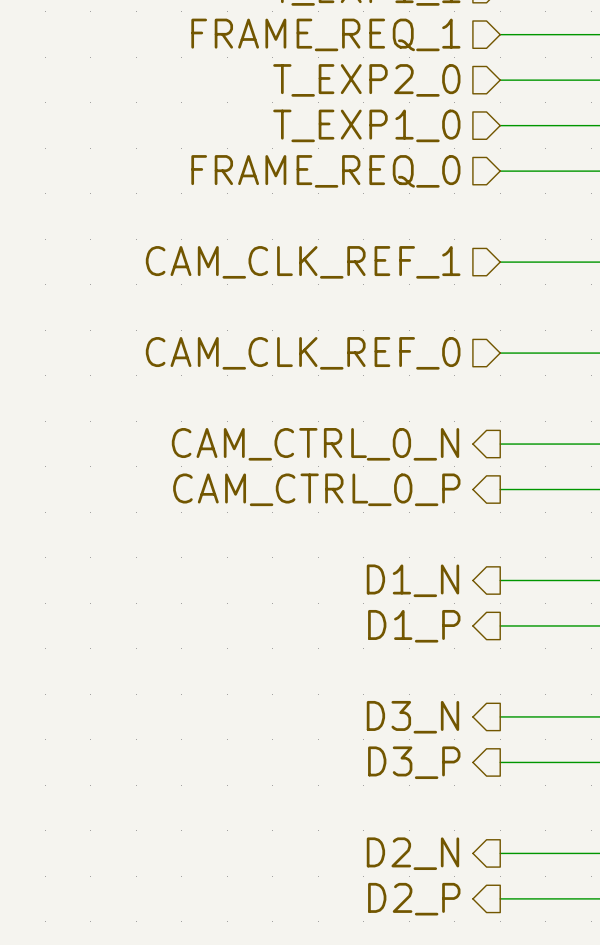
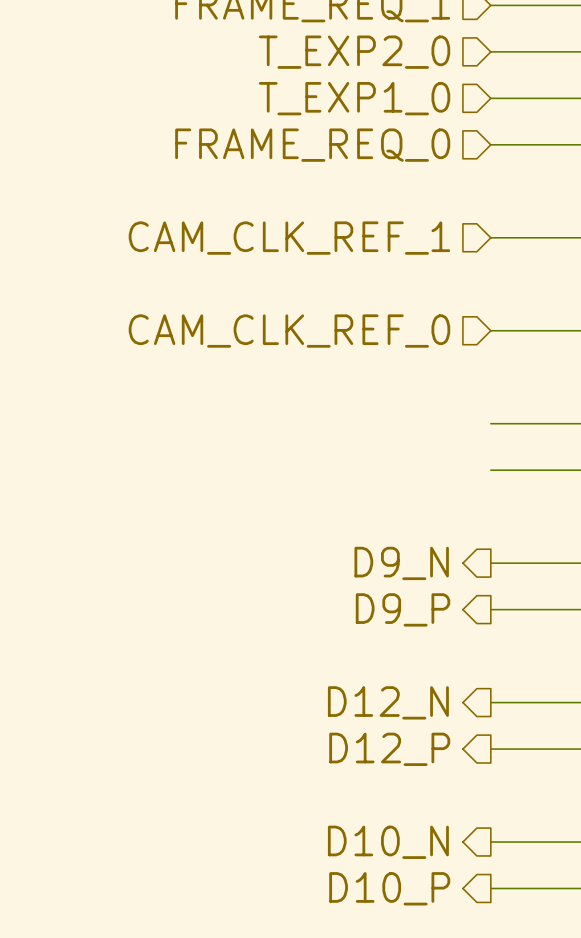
hierarchical label: CAM_CTRL_0_N (315, 444) -> none
hierarchical label: CAM_CTRL_0_P (316, 489) -> none
hierarchical label: D1_N (412, 580) -> D9_N (401, 563)
hierarchical label: D1_P (414, 626) -> D9_P (403, 609)
hierarchical label: D3_N (412, 717) -> D12_N (388, 702)
hierarchical label: D3_P (414, 762) -> D12_P (389, 749)
hierarchical label: D2_N (412, 853) -> D10_N (388, 842)
hierarchical label: D2_P (414, 899) -> D10_P (389, 888)

